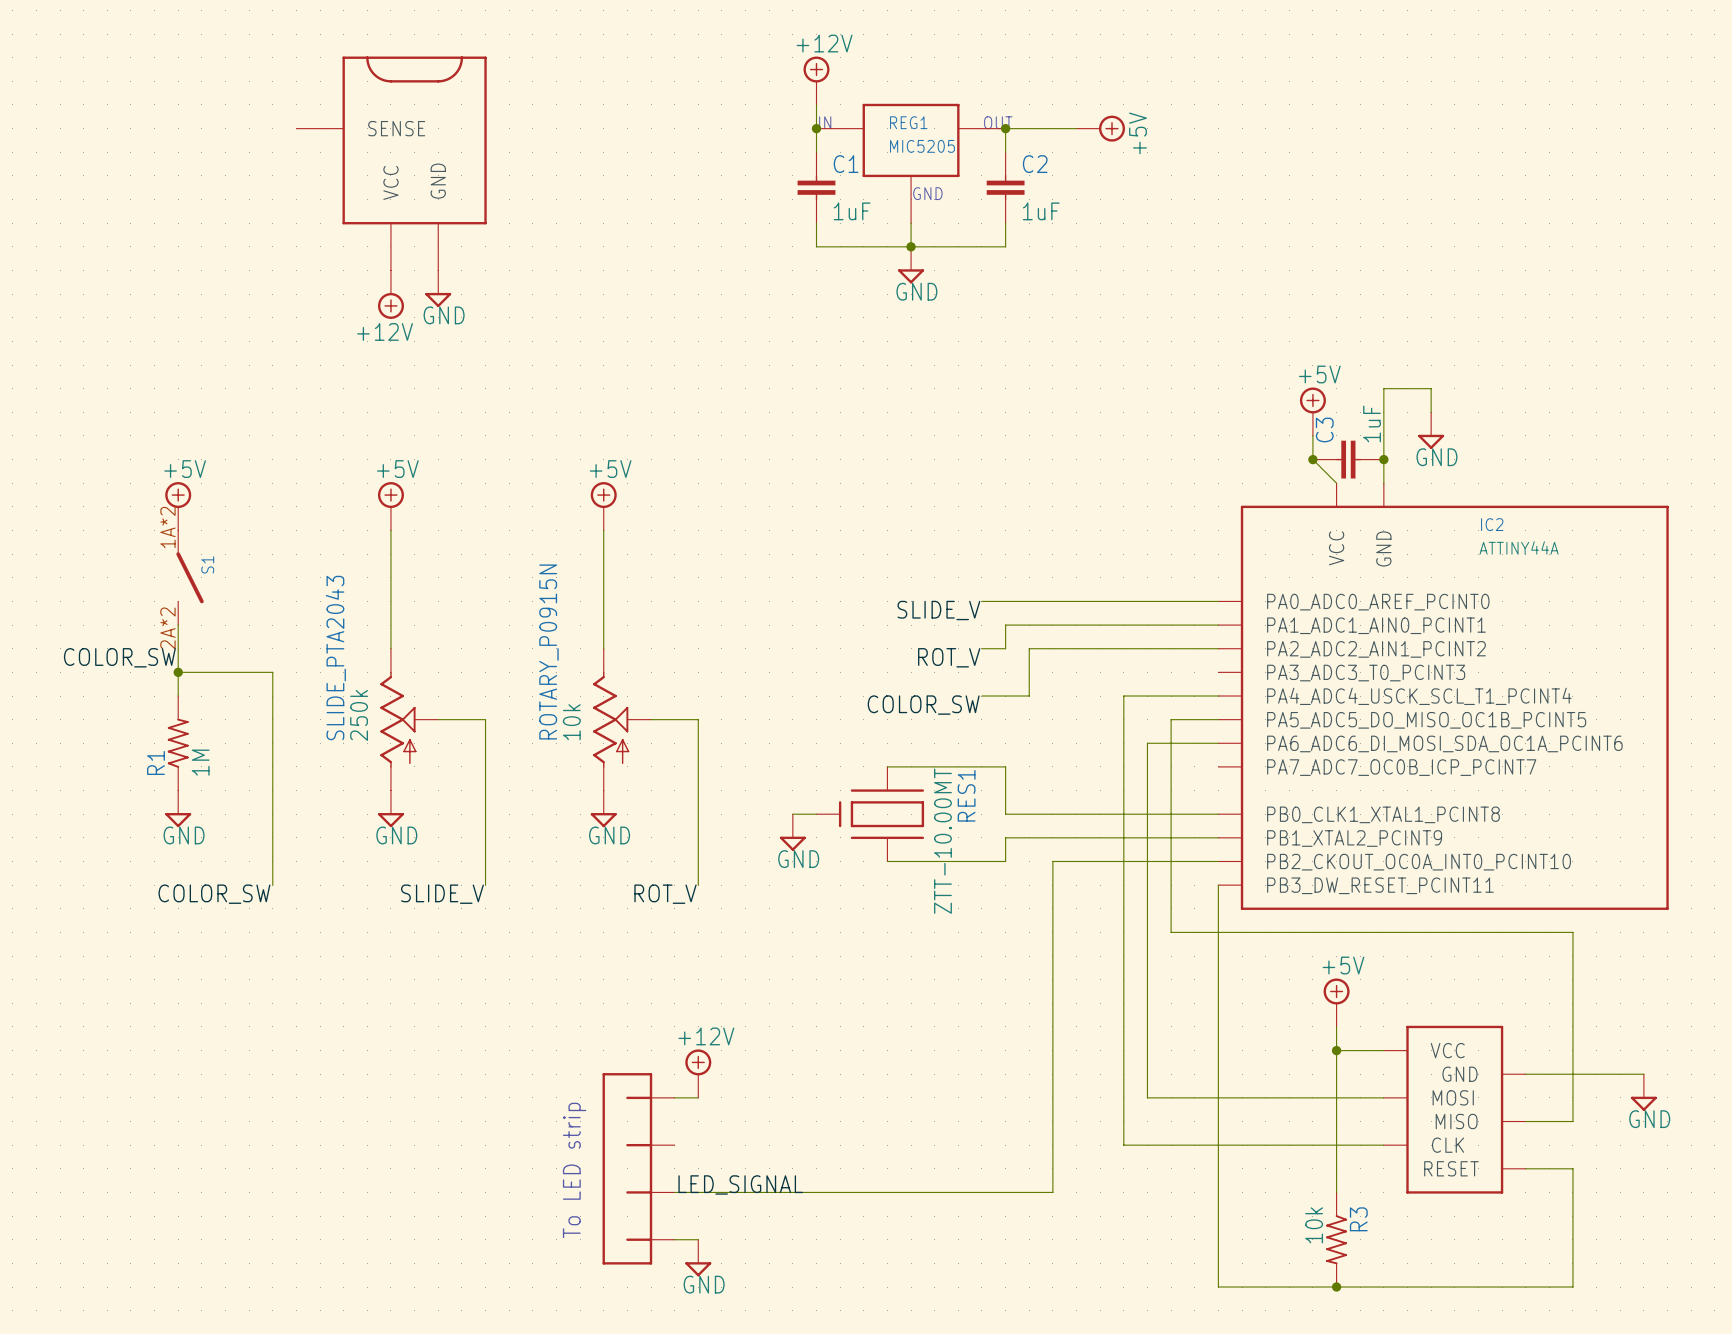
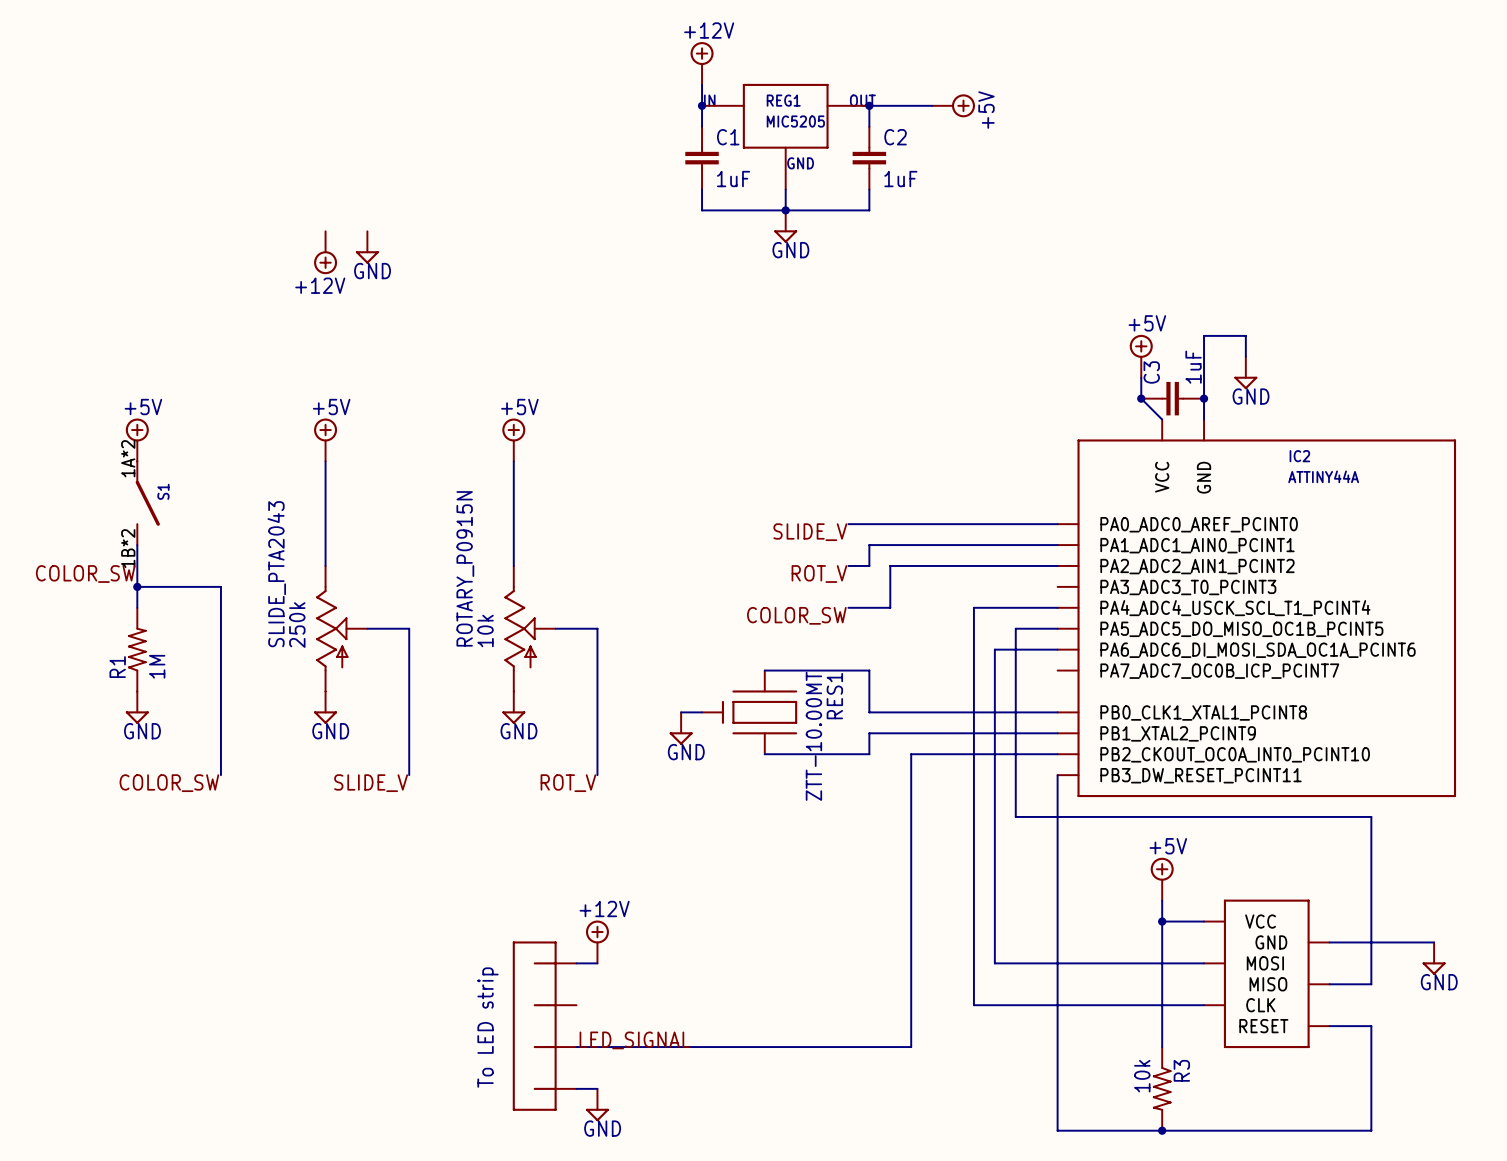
part: (391, 163) -> none
S1 pin number: 2A*2 (167, 628) -> 1B*2 (128, 548)

